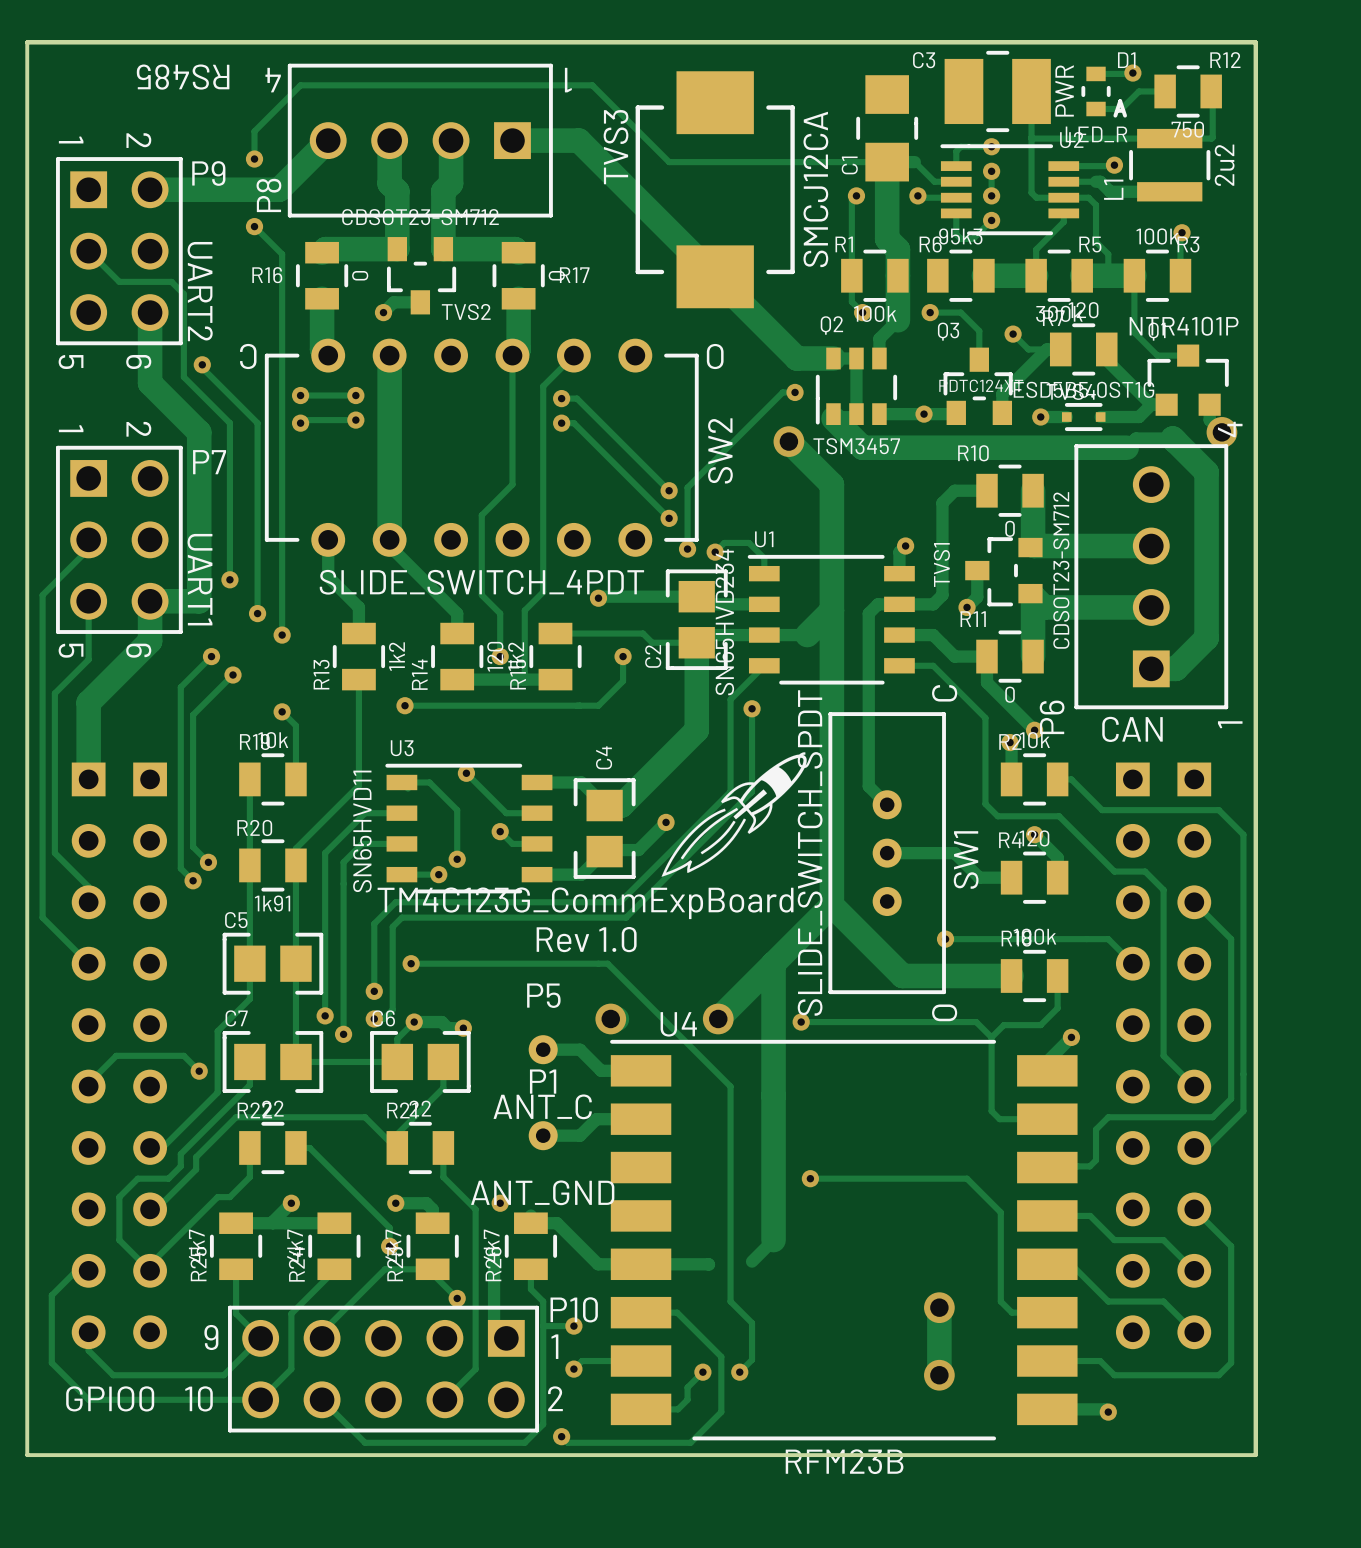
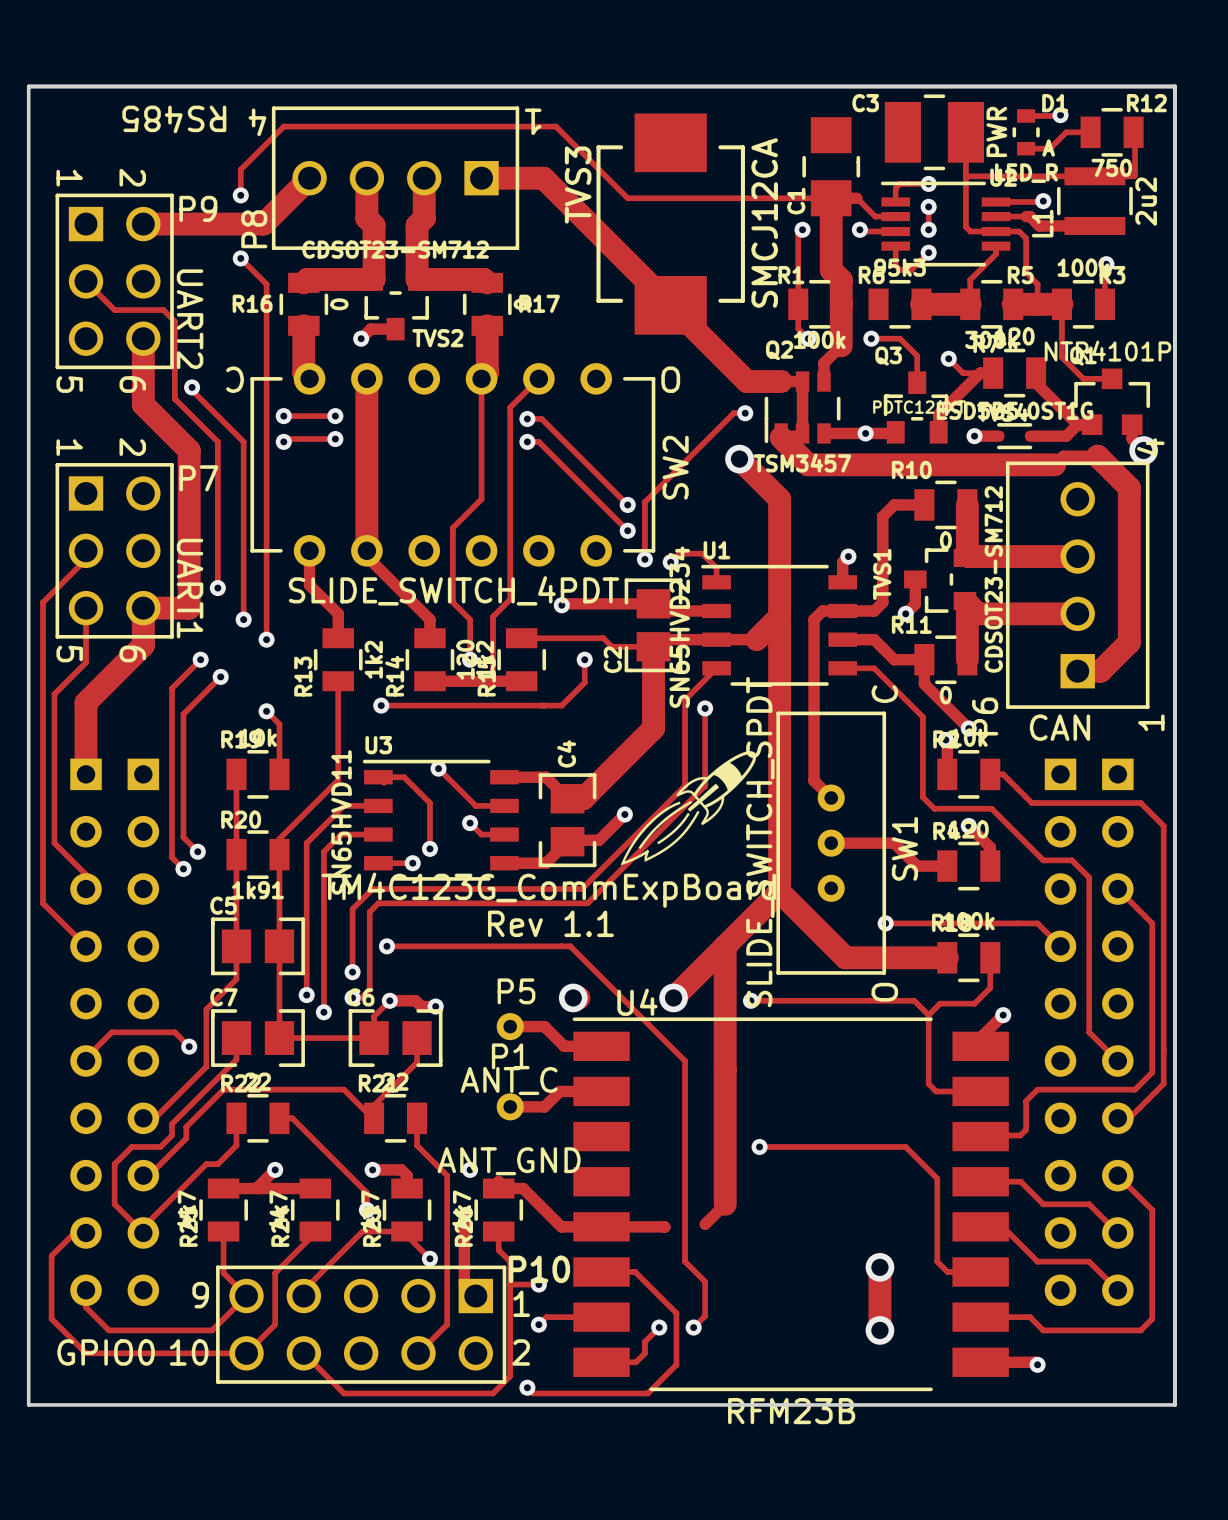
text: Rev 1.0 (586, 939) -> Rev 1.1 (550, 923)
P5 name position: P5 (543, 995) -> P5 (516, 991)

